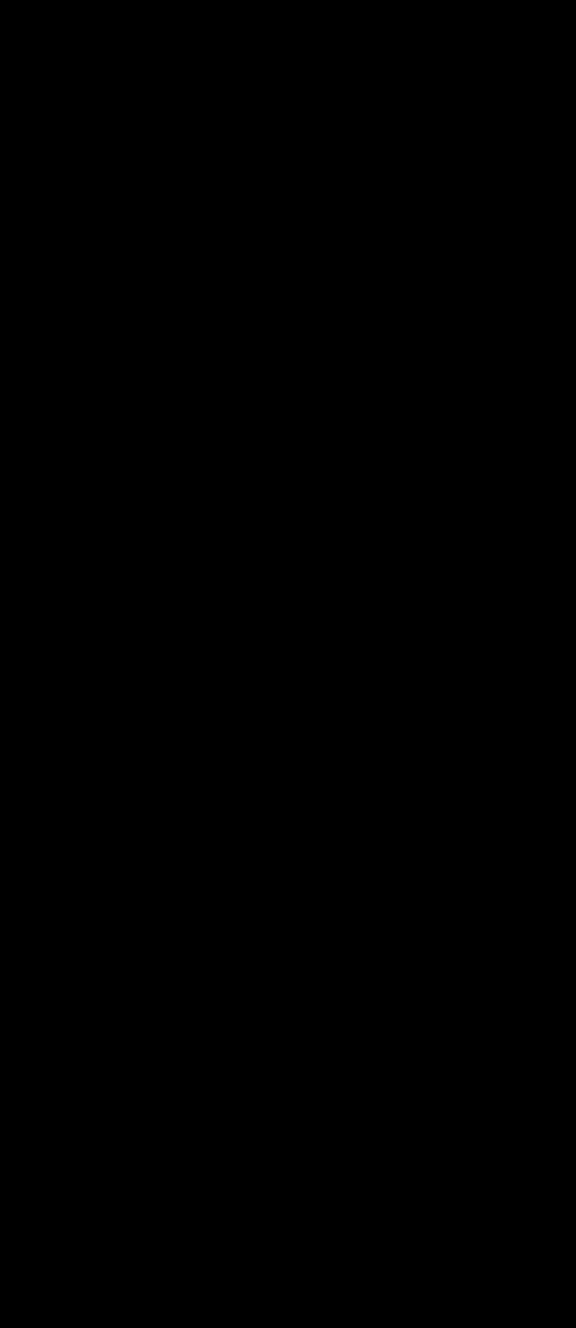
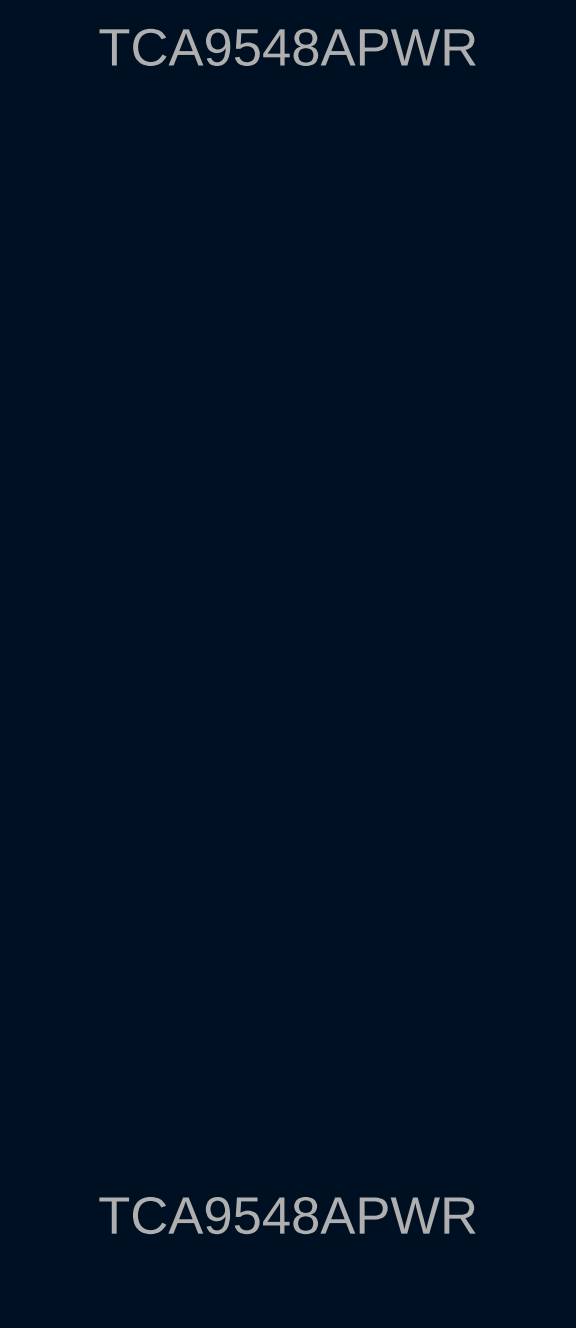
part: none -> TCA9548APWR (287, 47)
part: none -> TCA9548APWR (287, 1215)

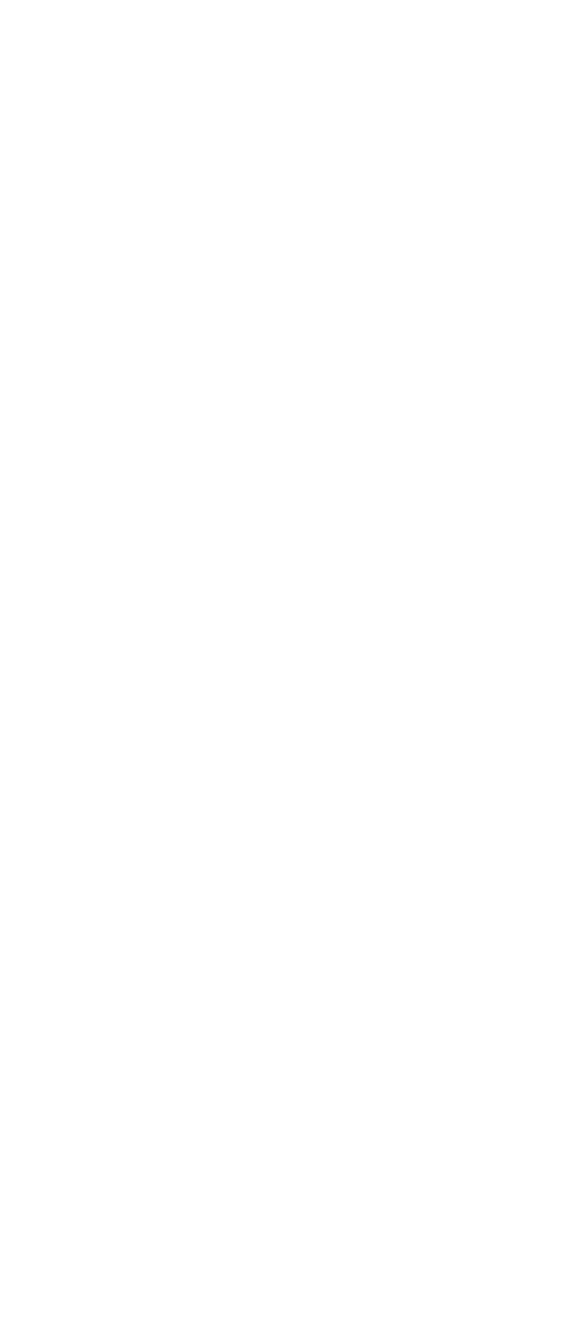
part: TCA9548APWR (287, 47) -> none
part: TCA9548APWR (287, 1215) -> none

